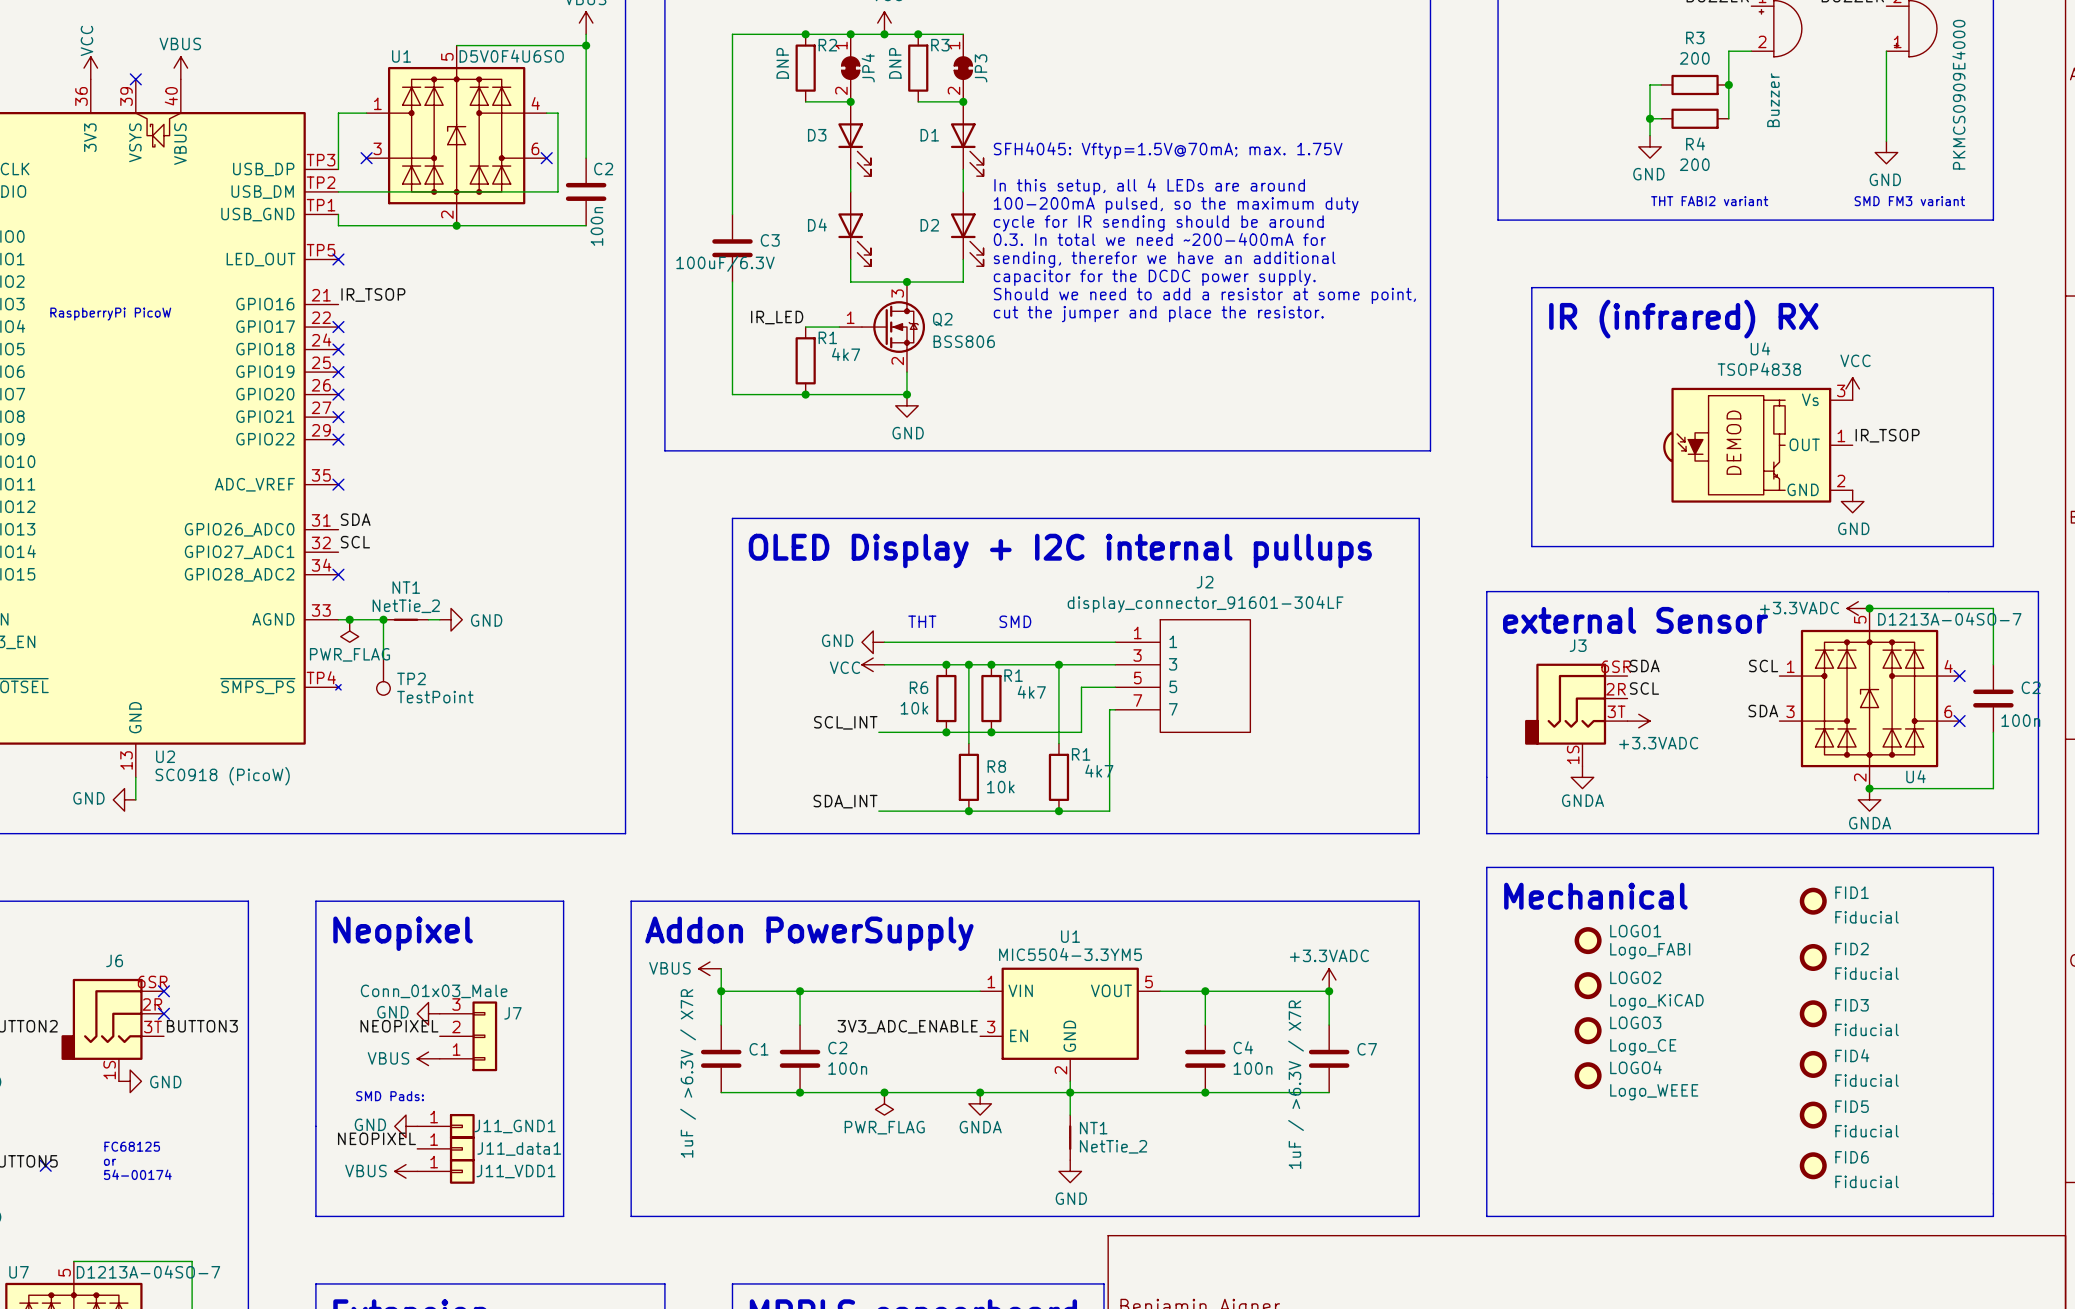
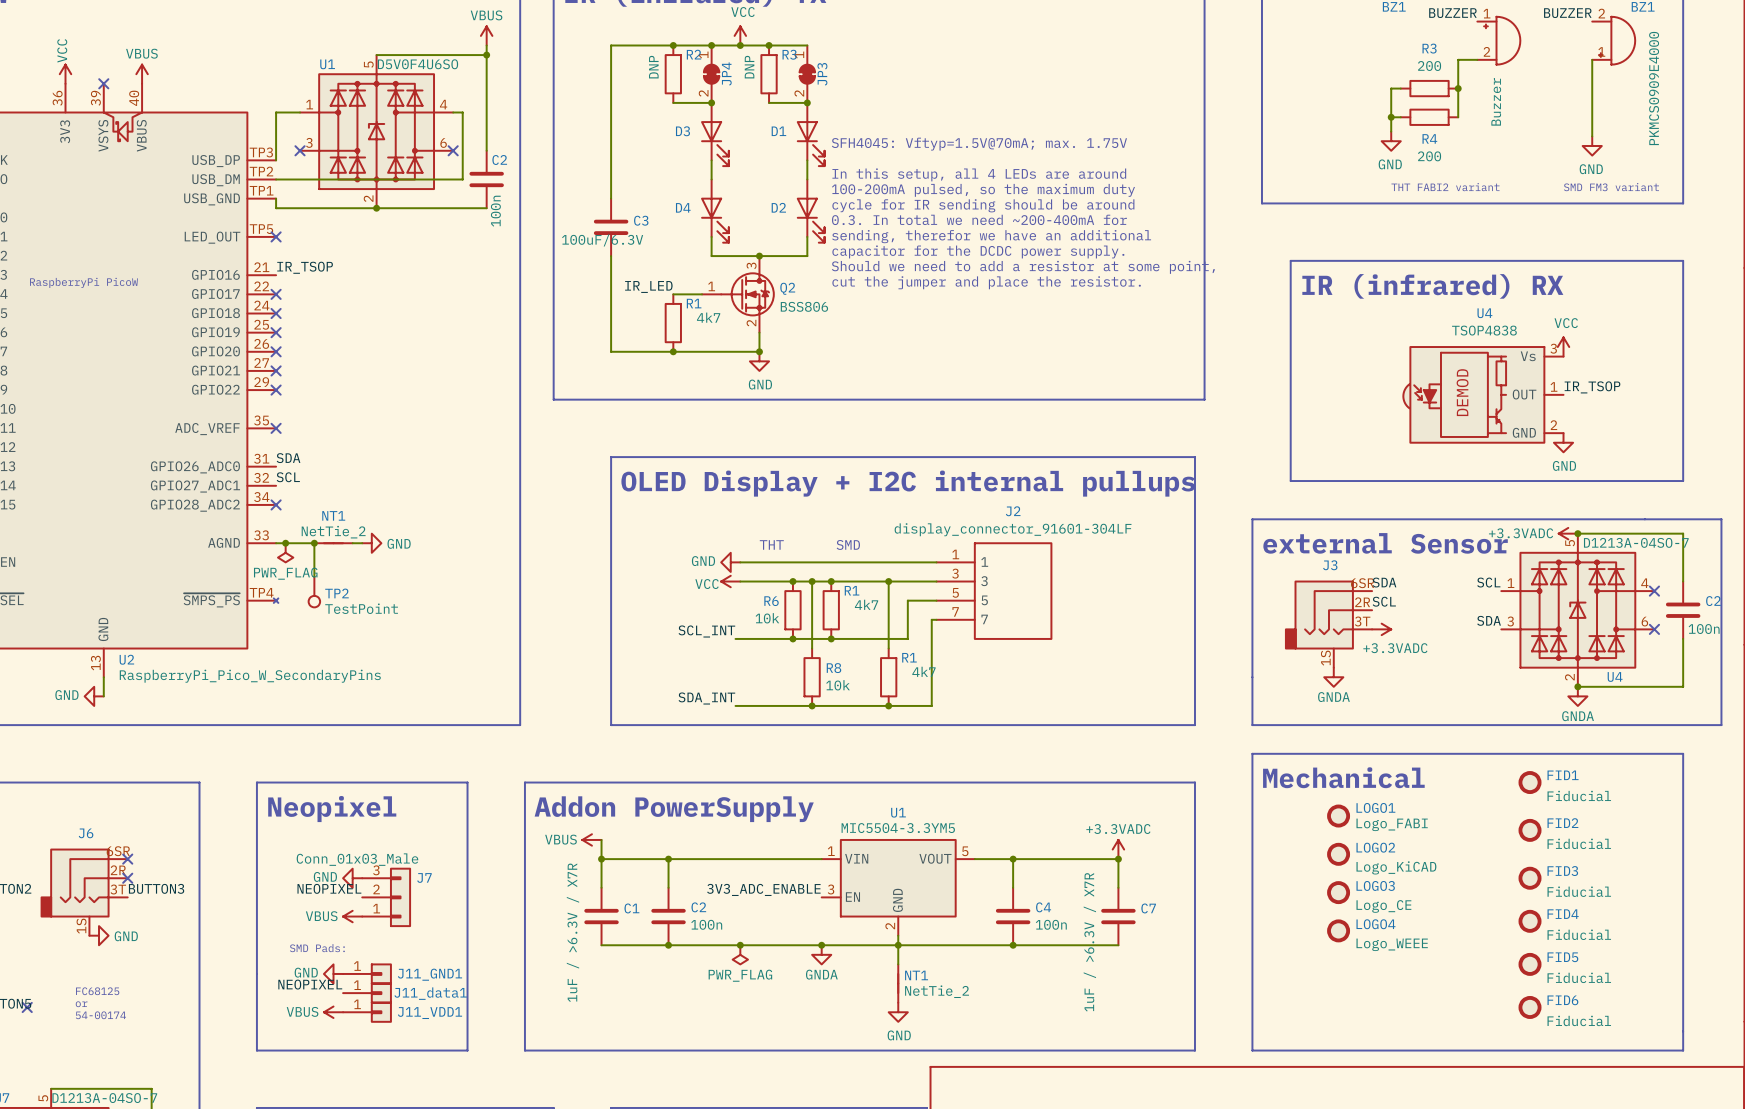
U2 value: SC0918 (PicoW) (222, 776) -> RaspberryPi_Pico_W_SecondaryPins (250, 676)

